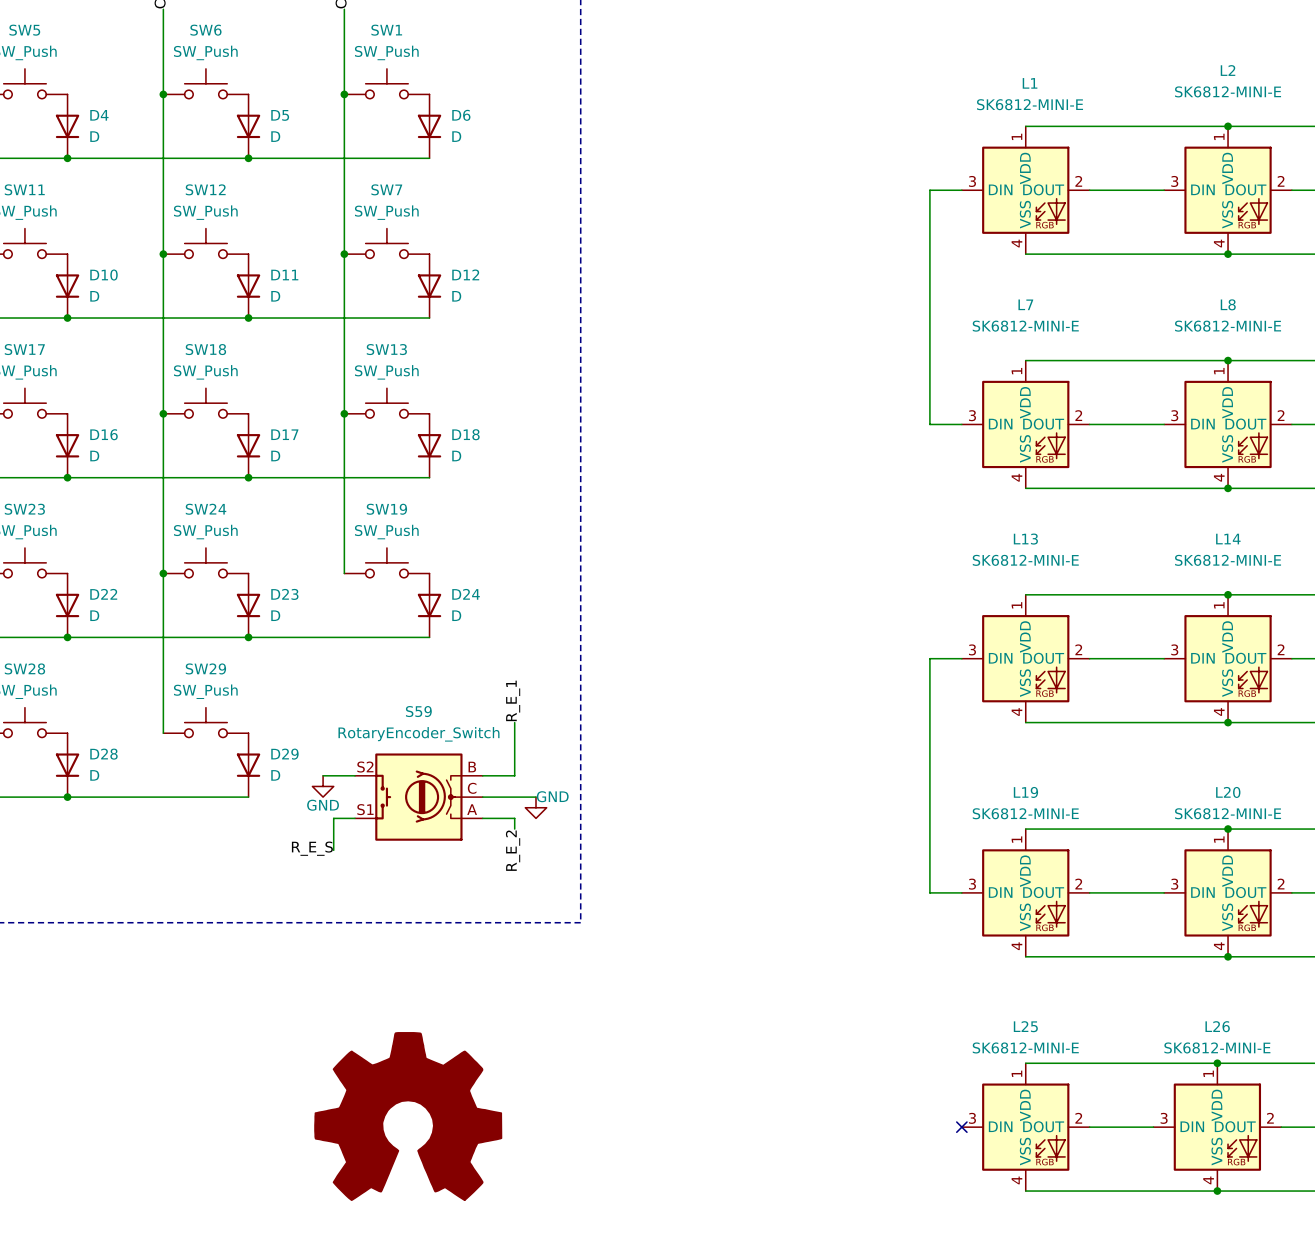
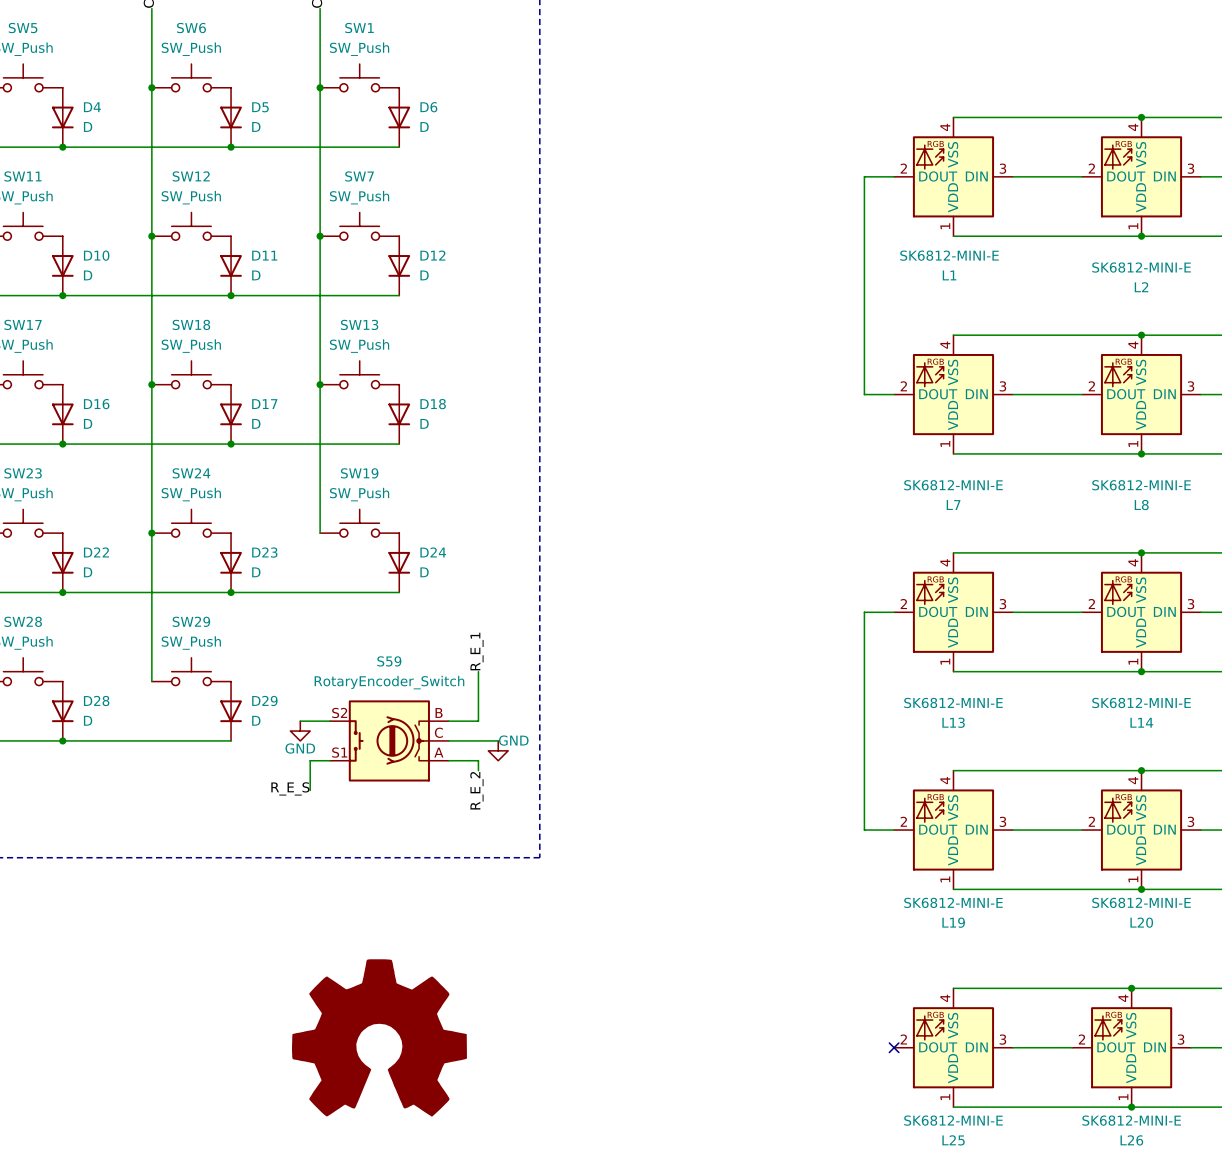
L1 rotation: 0° (1025, 190) -> 180° (953, 176)
L2 rotation: 0° (1228, 190) -> 180° (1141, 176)
L7 rotation: 0° (1025, 424) -> 180° (953, 394)
L8 rotation: 0° (1228, 424) -> 180° (1141, 394)
L13 rotation: 0° (1025, 658) -> 180° (953, 612)
L14 rotation: 0° (1228, 658) -> 180° (1141, 612)
L19 rotation: 0° (1025, 892) -> 180° (953, 830)
L20 rotation: 0° (1228, 892) -> 180° (1141, 830)
L25 rotation: 0° (1025, 1127) -> 180° (953, 1047)
L26 rotation: 0° (1217, 1127) -> 180° (1131, 1047)

